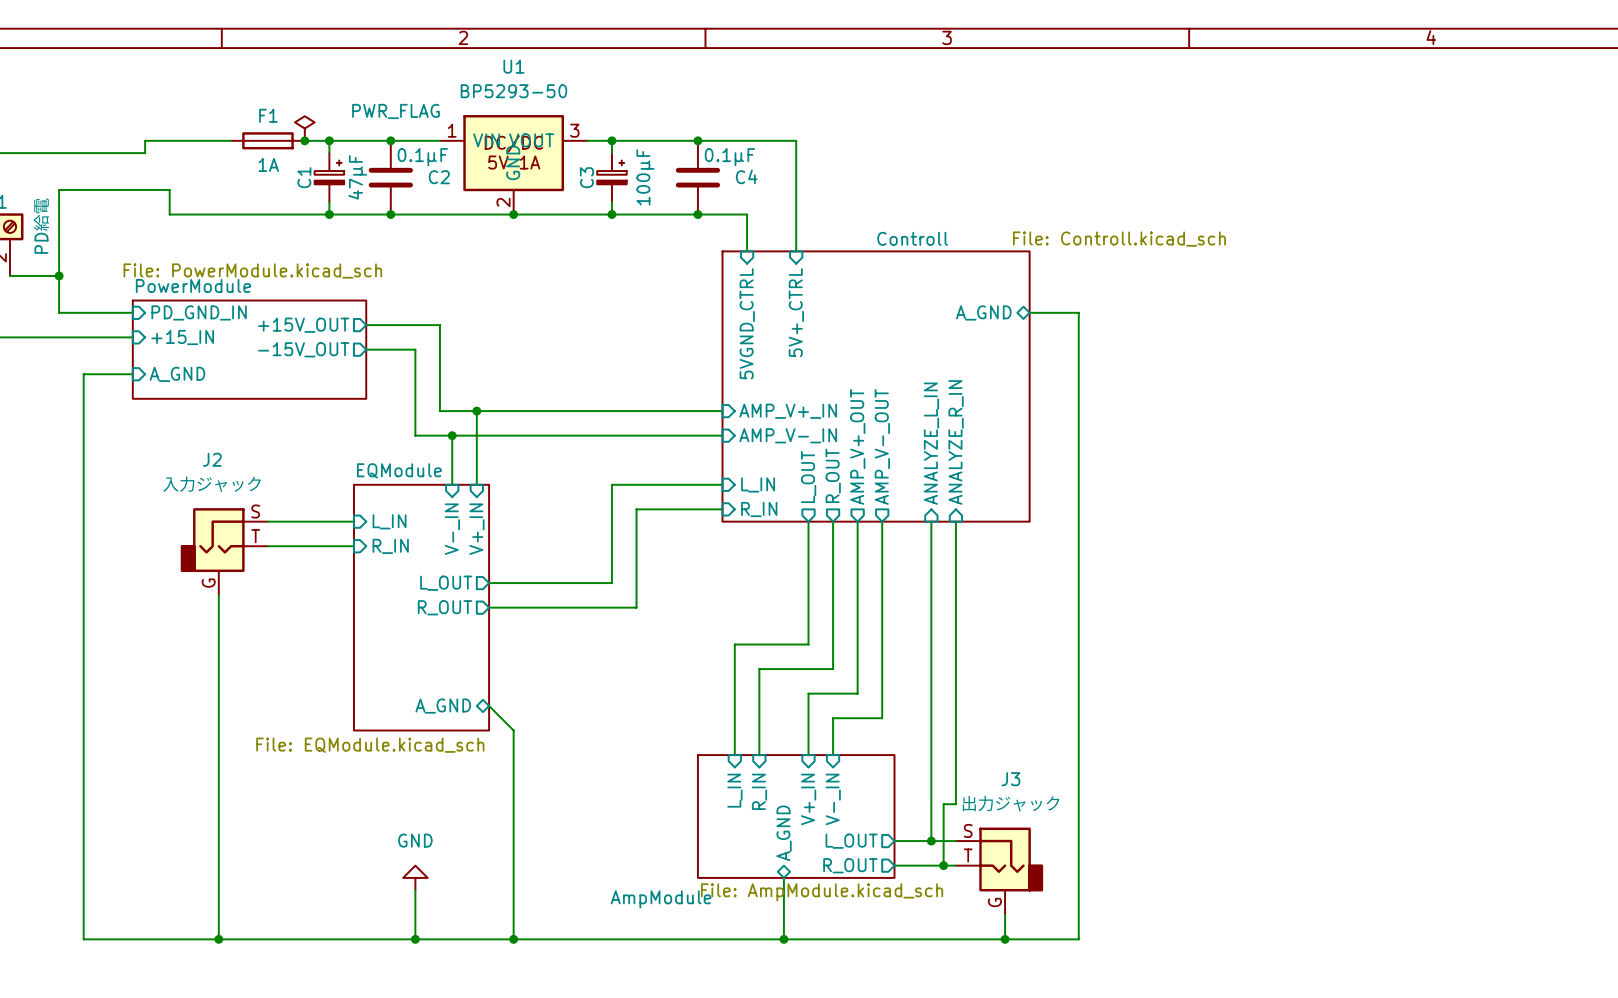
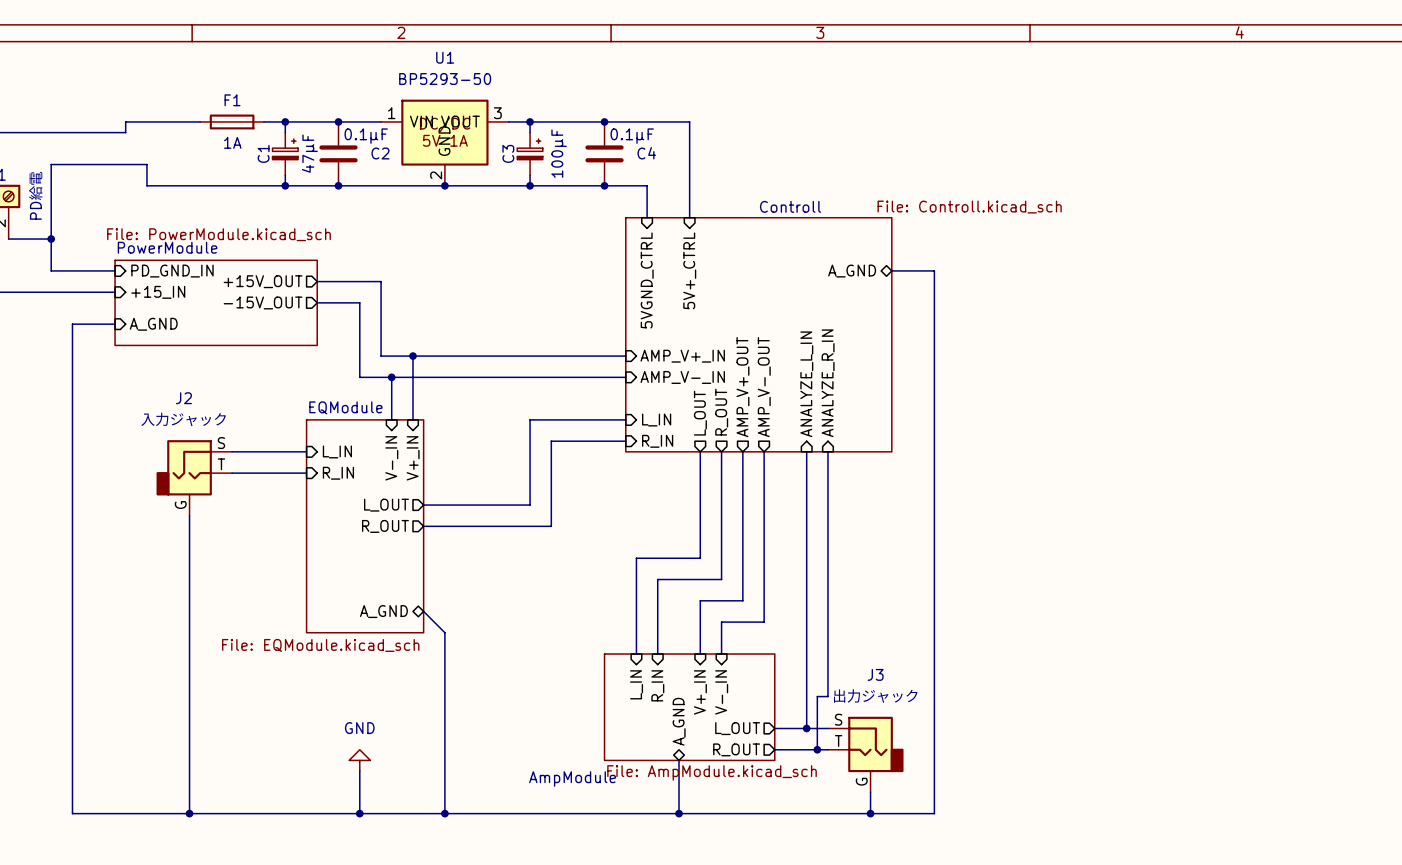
power symbol: PWR_FLAG (304, 128) -> none
junction: (304, 140) -> none

